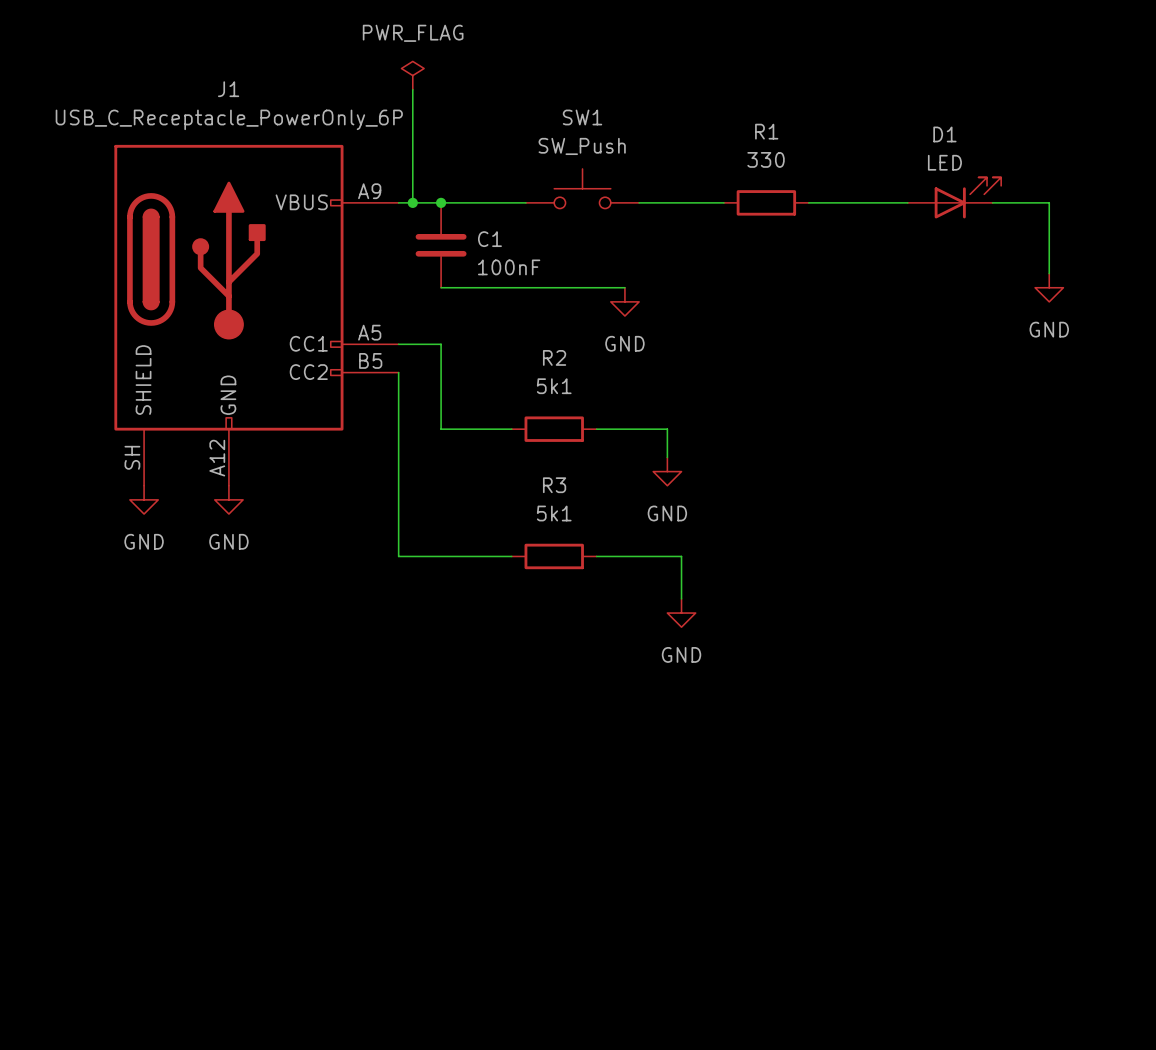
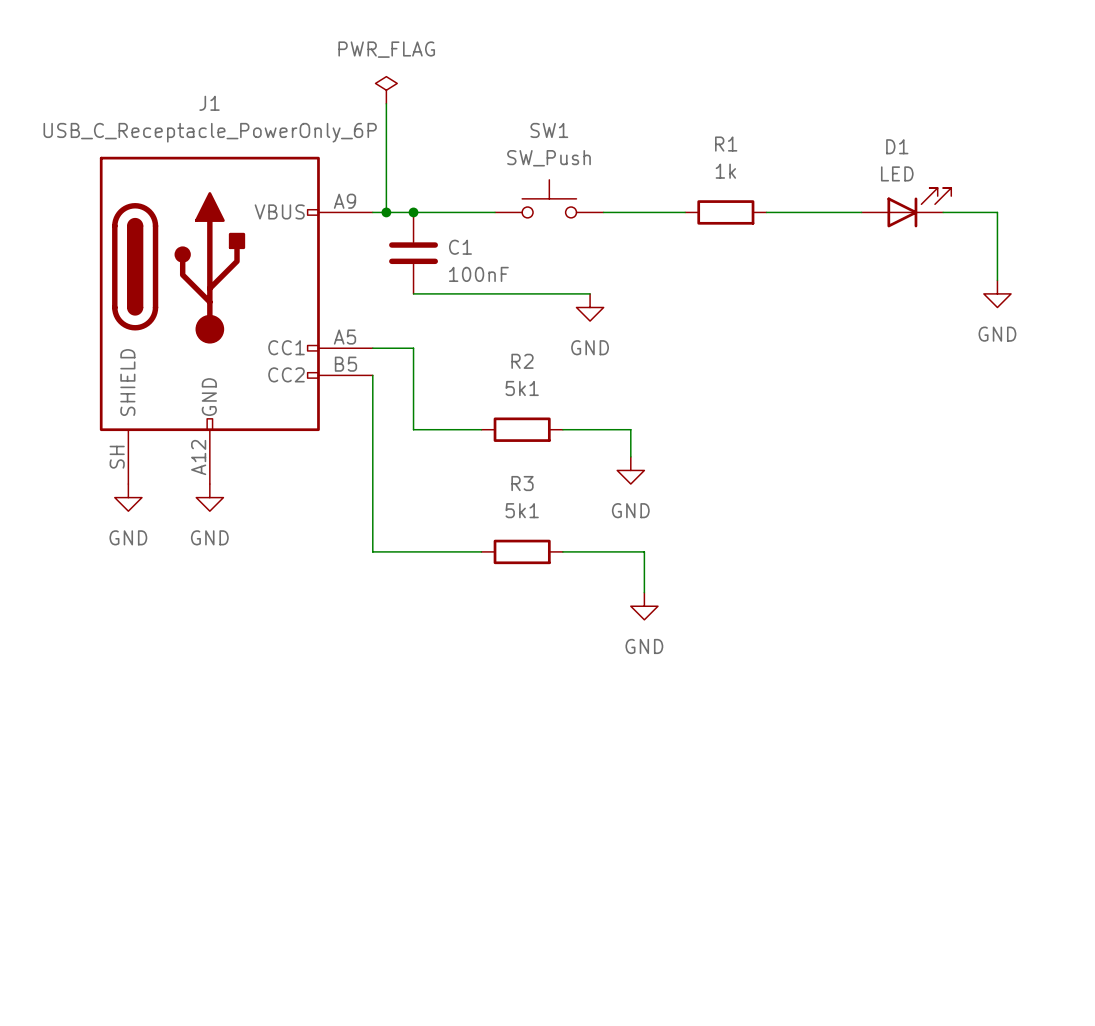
R1 value: 330 (766, 159) -> 1k (725, 171)

